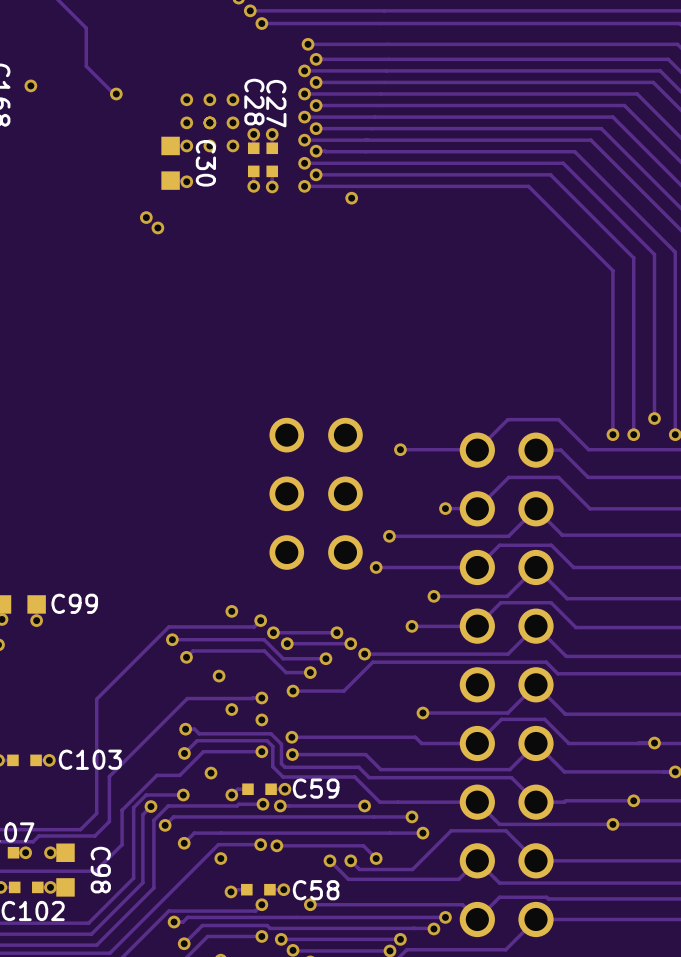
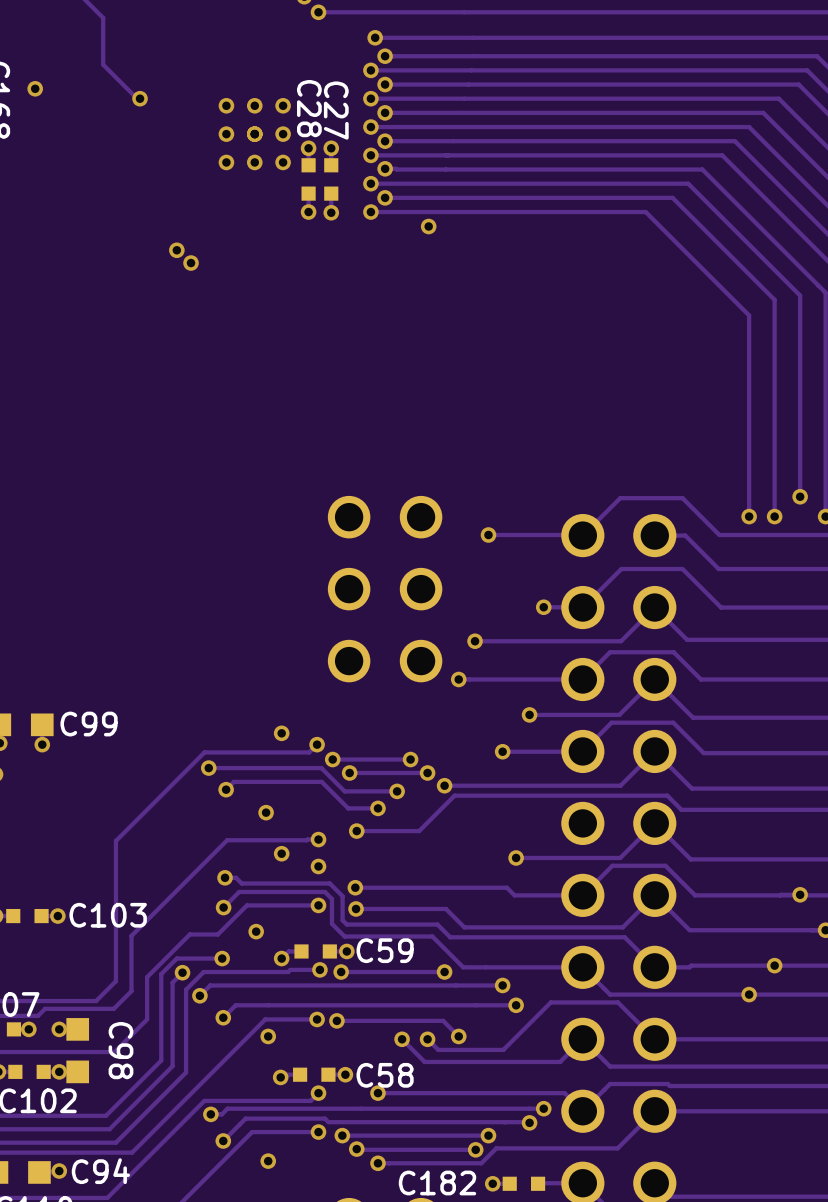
C30: (170, 163) -> none
via: (186, 181) -> none

